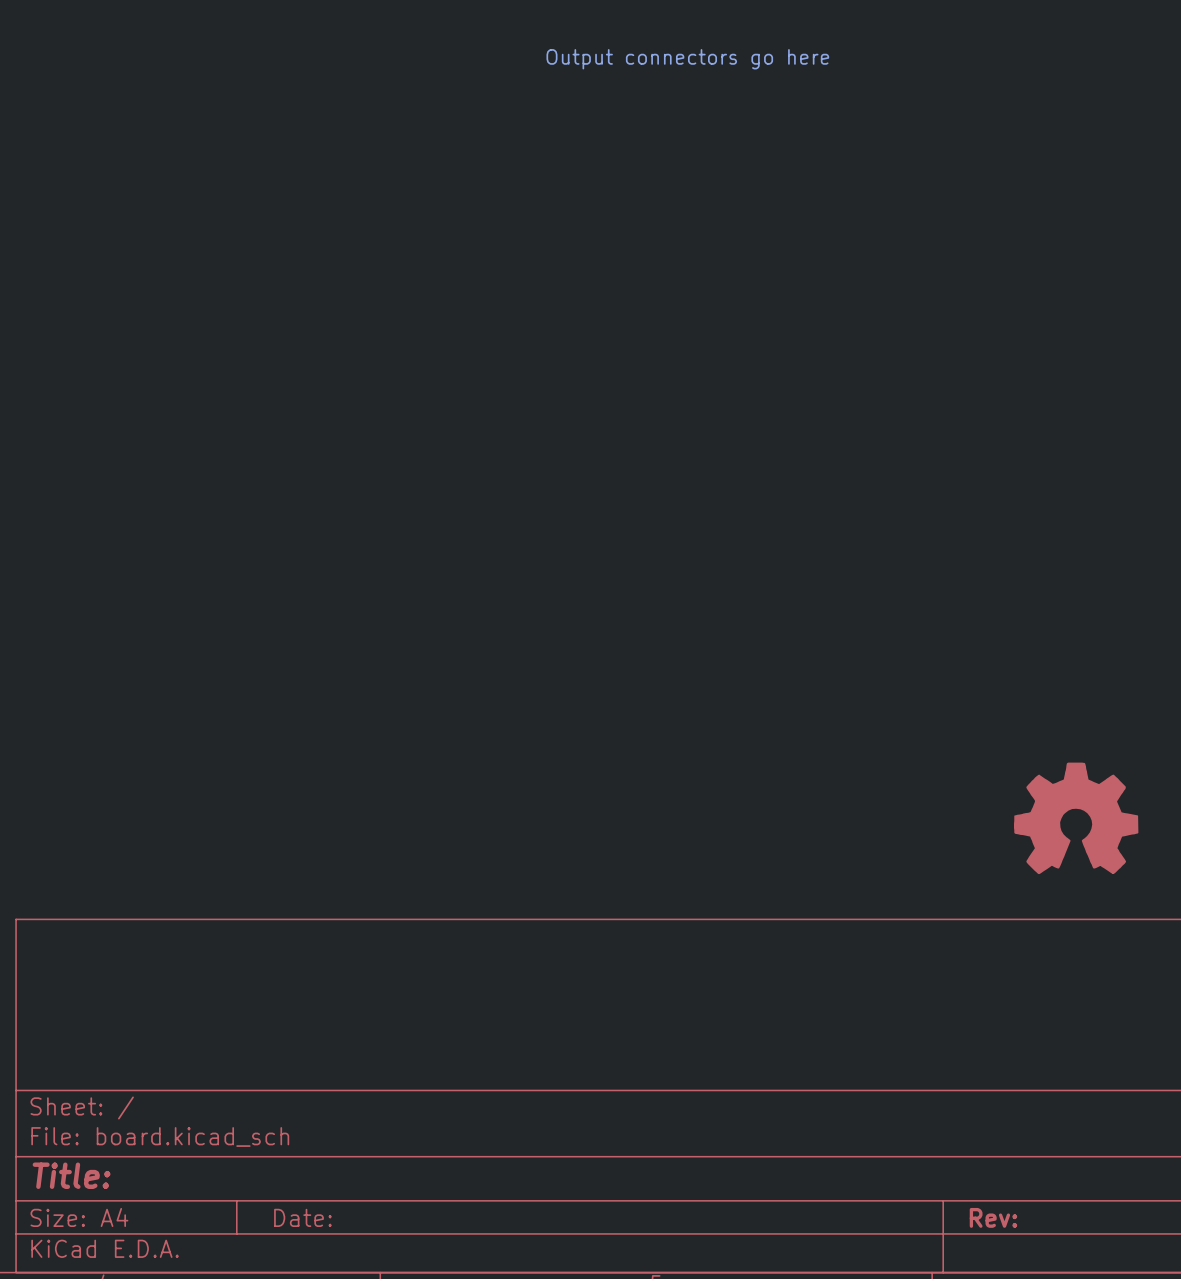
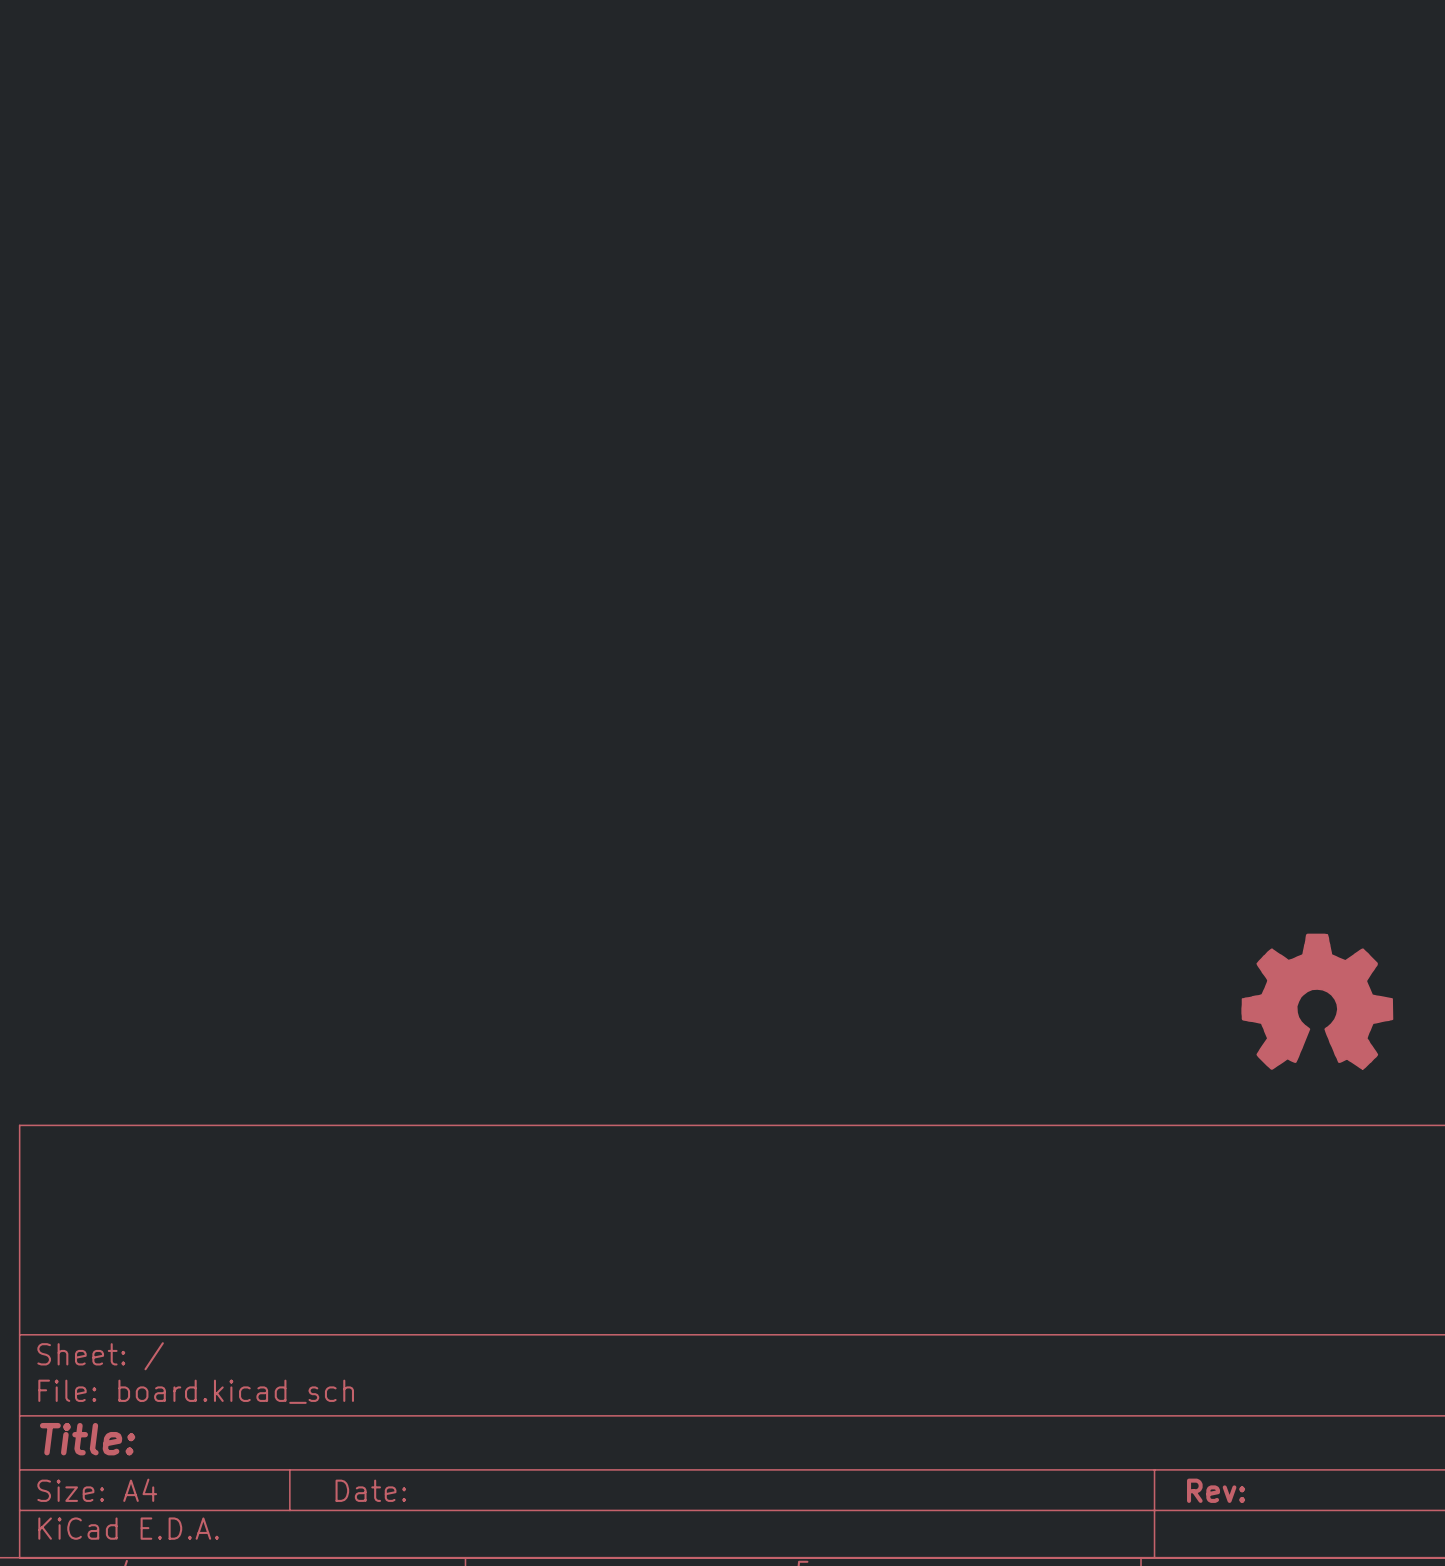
text: Output connectors go here (687, 59) -> none

